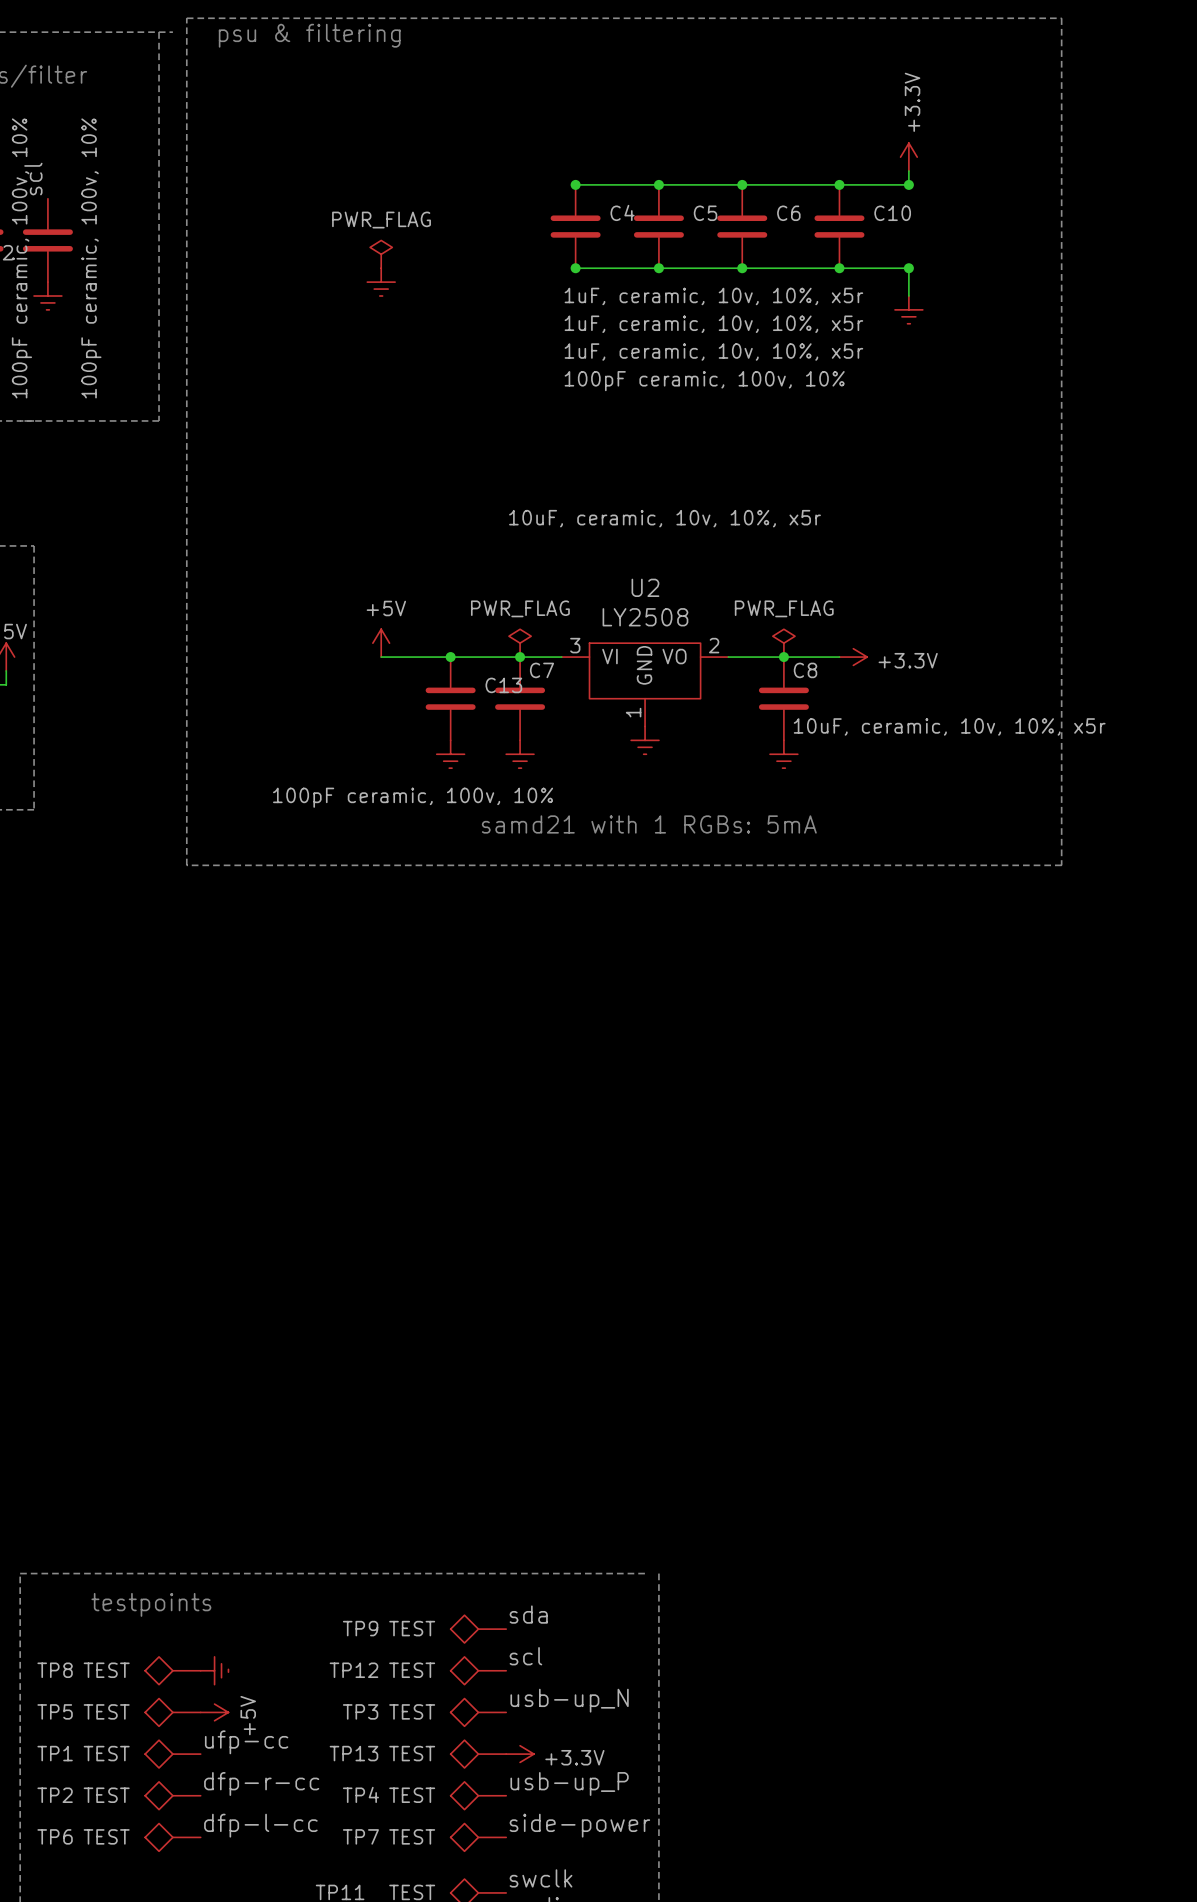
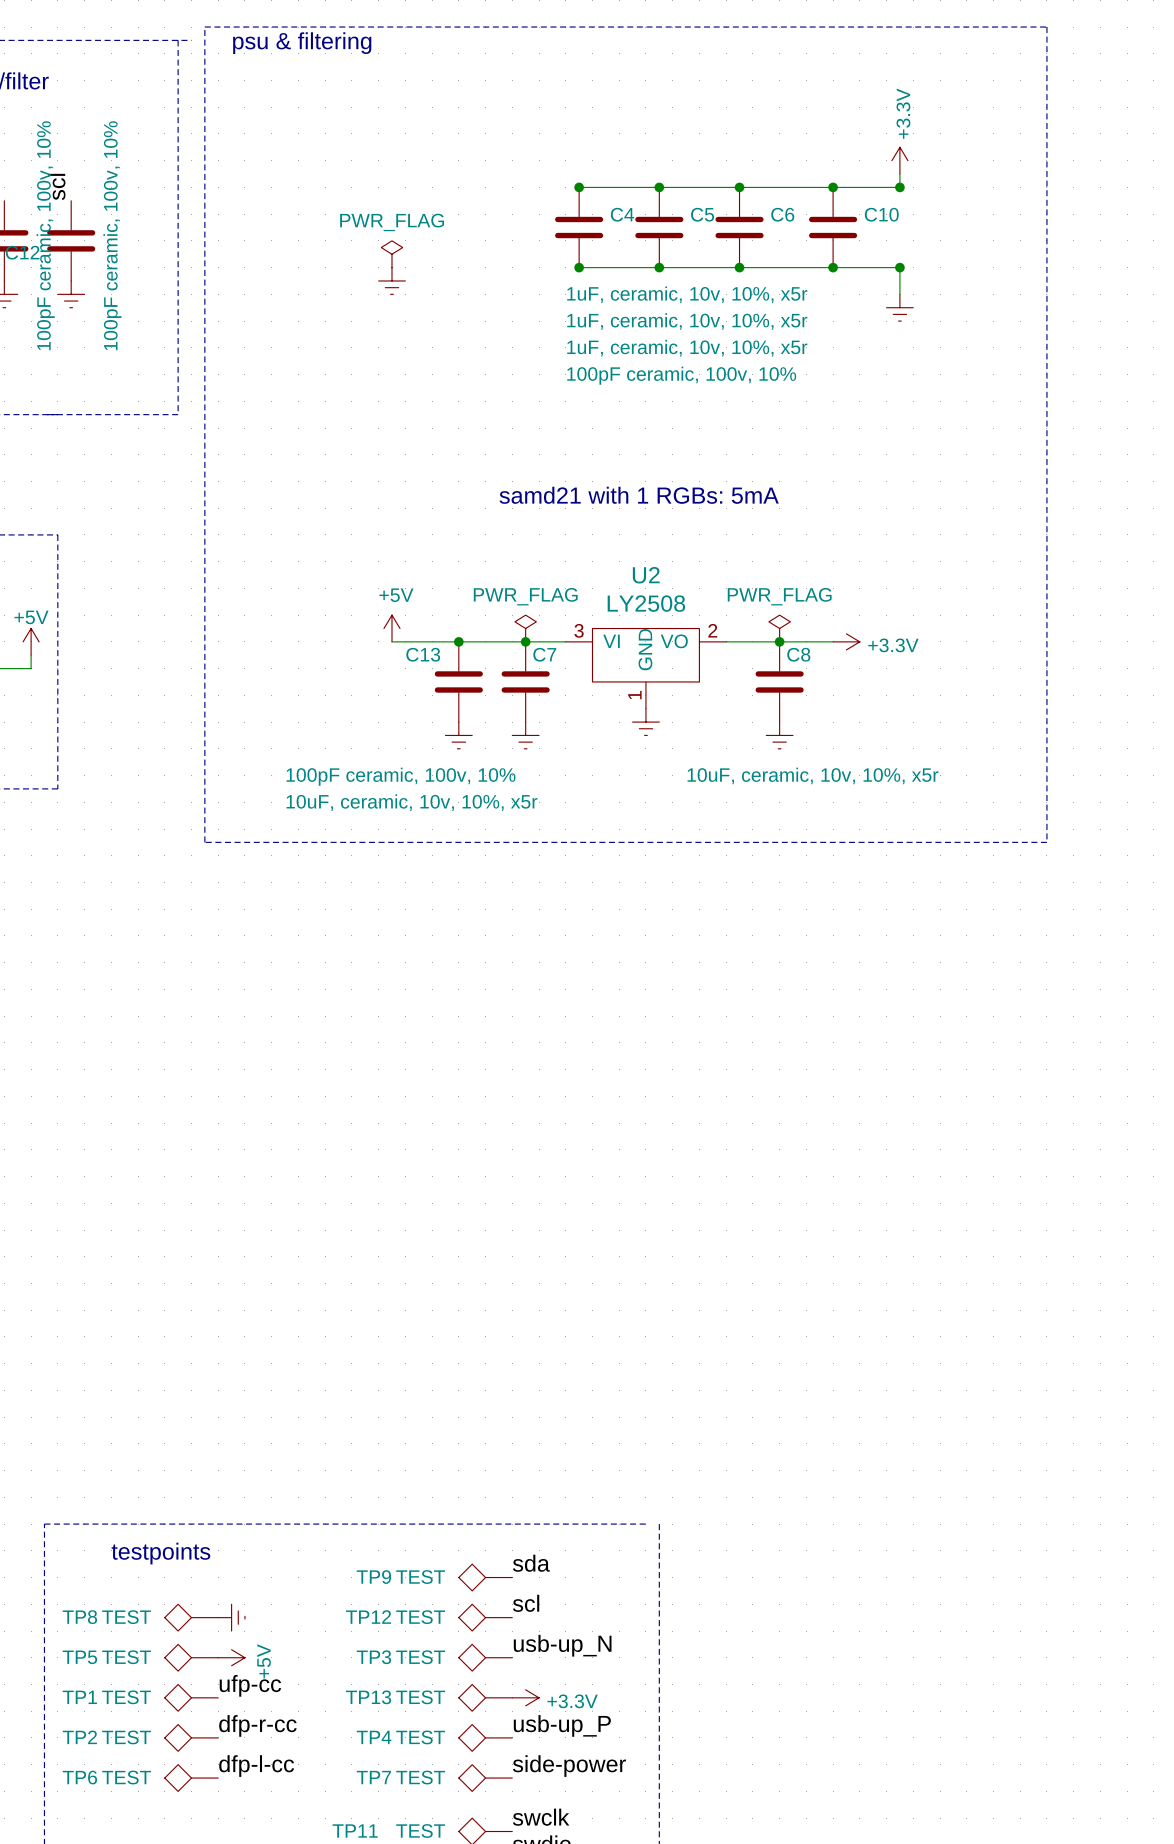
text: none -> samd21 with 1 RGBs: 5mA (639, 495)
C7 value position: 10uF, ceramic, 10v, 10%, x5r (664, 518) -> 10uF, ceramic, 10v, 10%, x5r (411, 802)
C13 name position: C13 (503, 685) -> C13 (423, 654)
C8 value position: 10uF, ceramic, 10v, 10%, x5r (949, 726) -> 10uF, ceramic, 10v, 10%, x5r (812, 775)
text: samd21 with 1 RGBs: 5mA (649, 824) -> none

